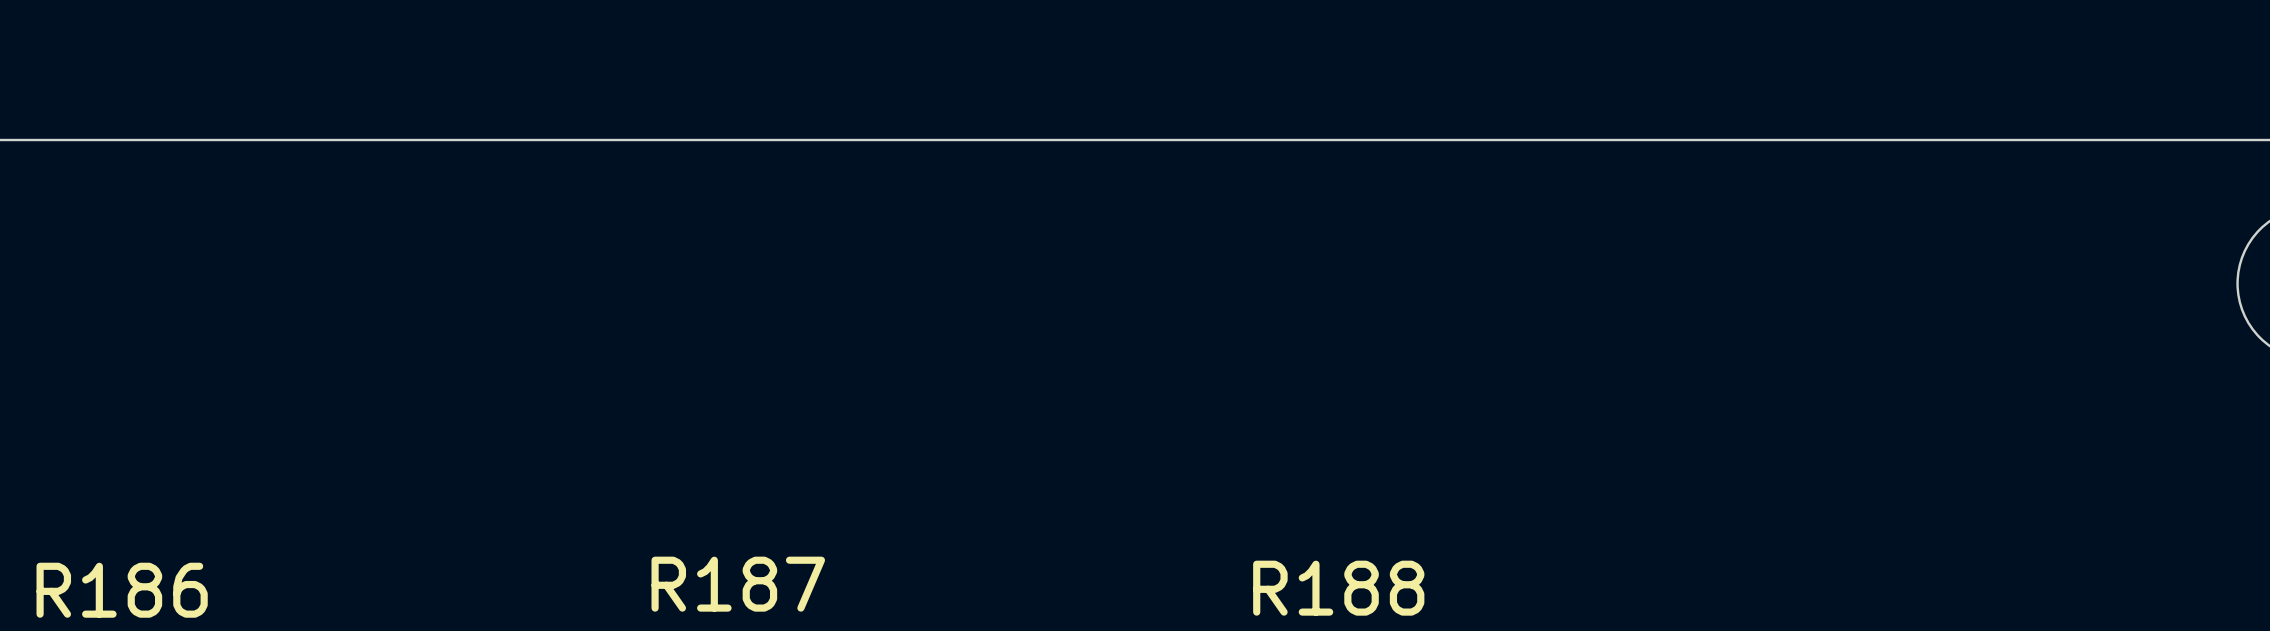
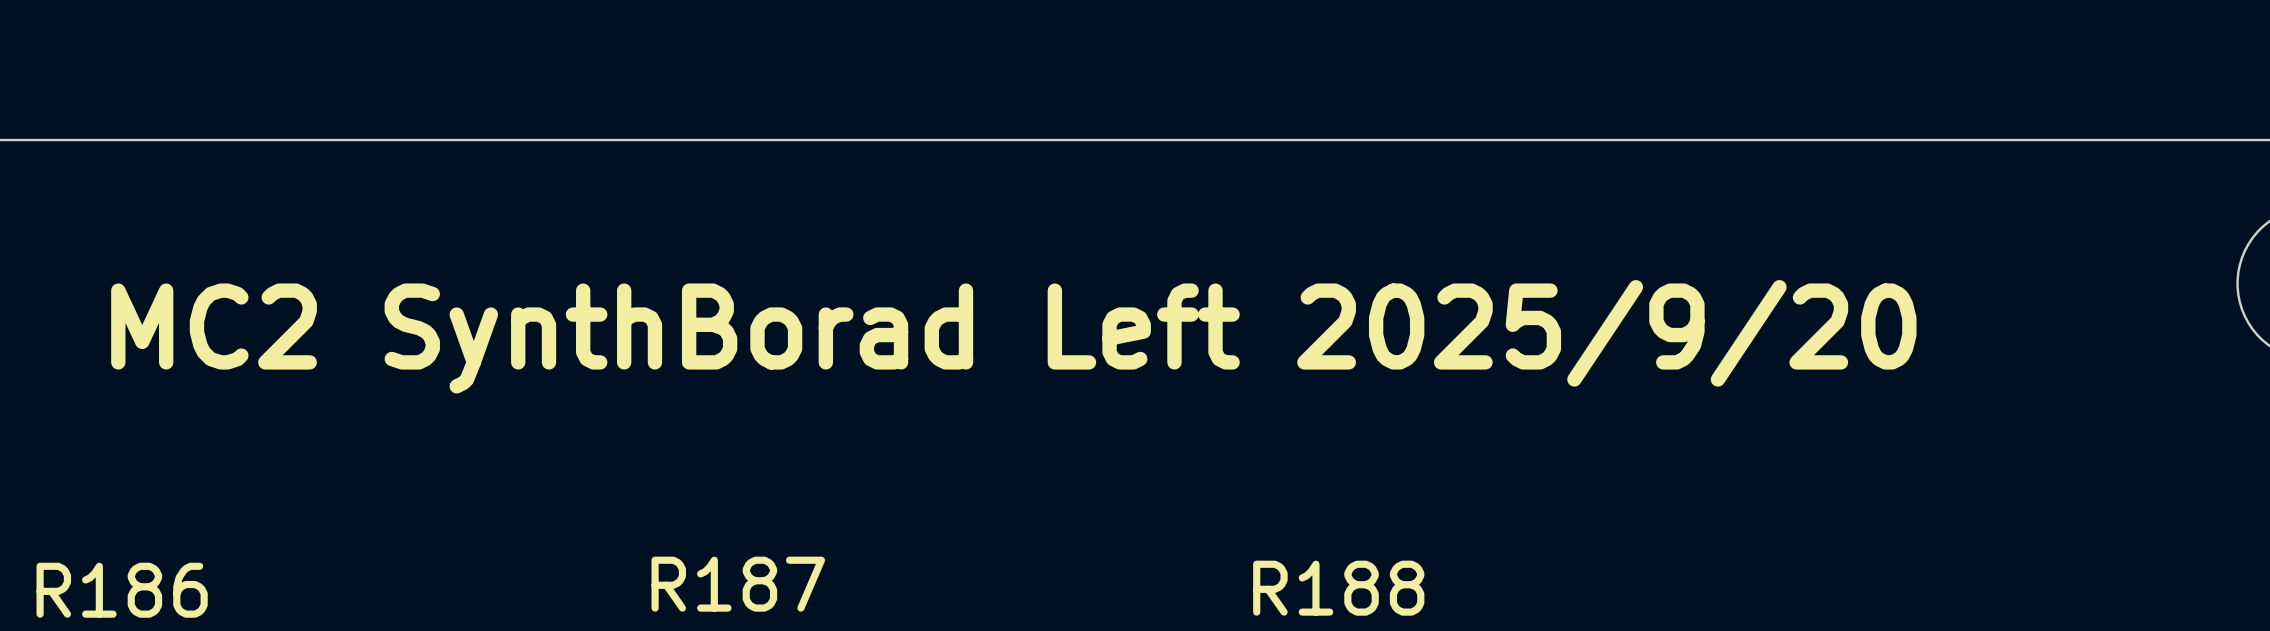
text: none -> MC2 SynthBorad Left 2025/9/20 (1013, 336)

